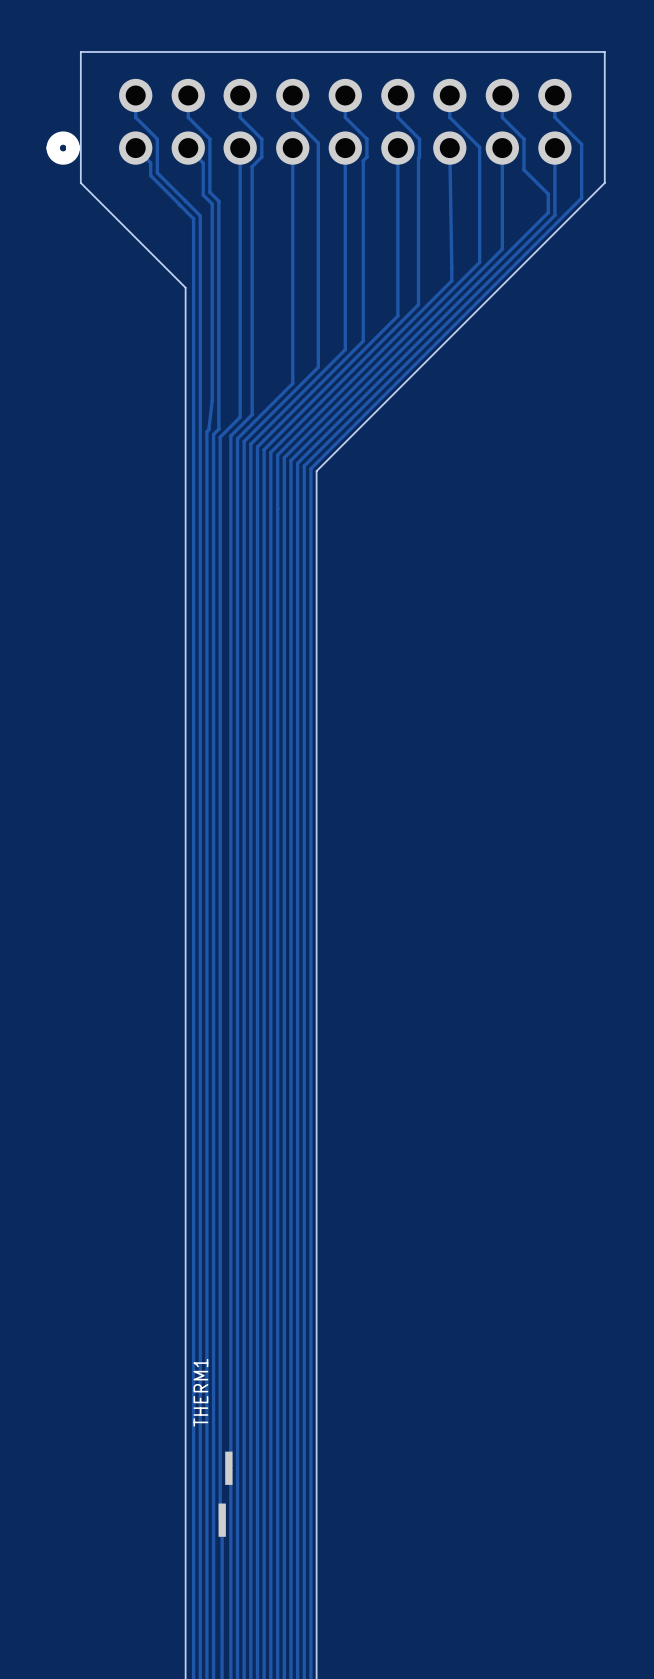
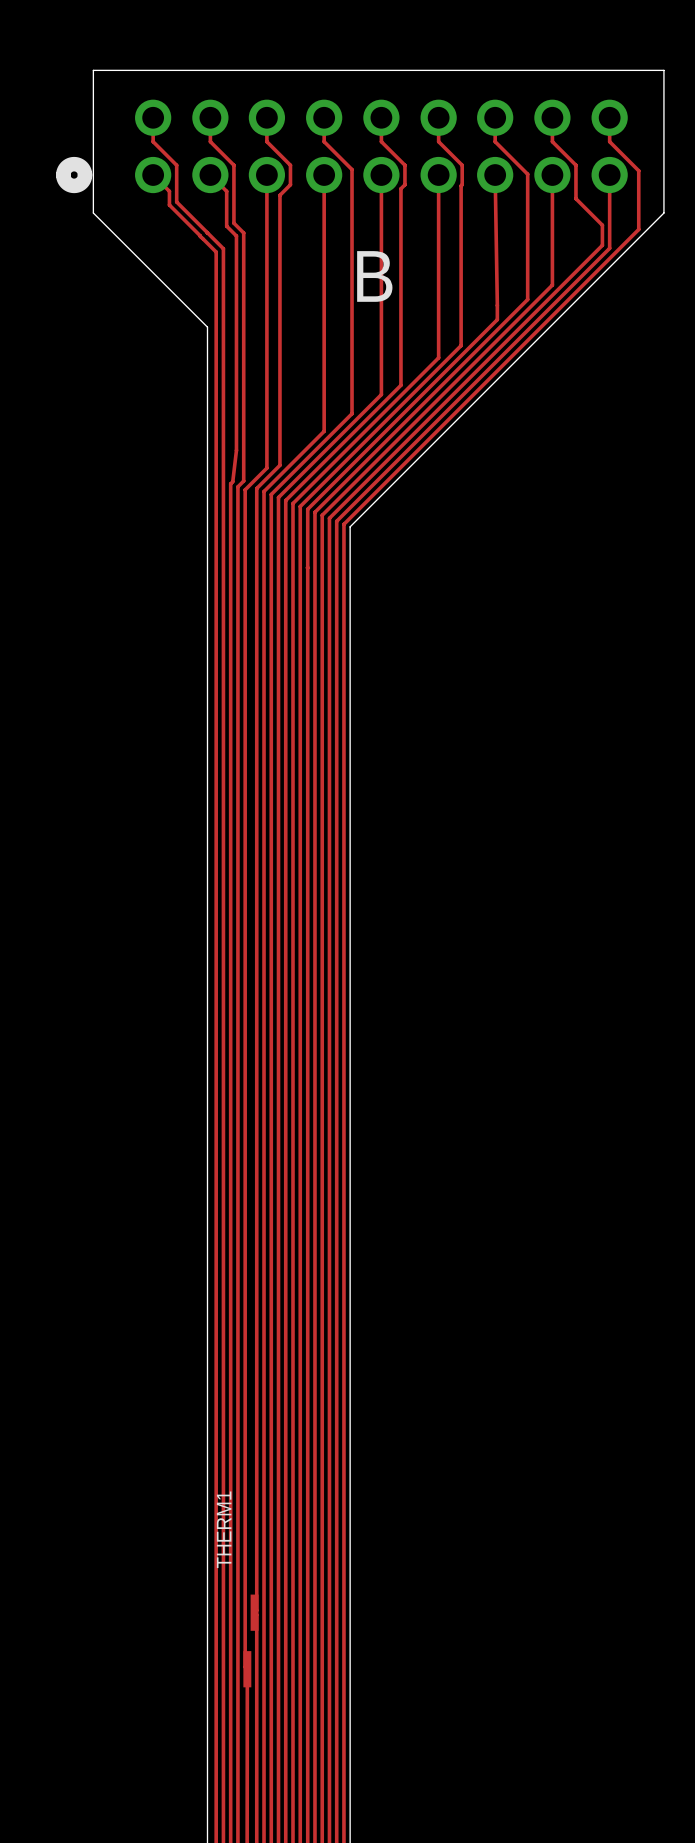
text: none -> B (374, 276)

